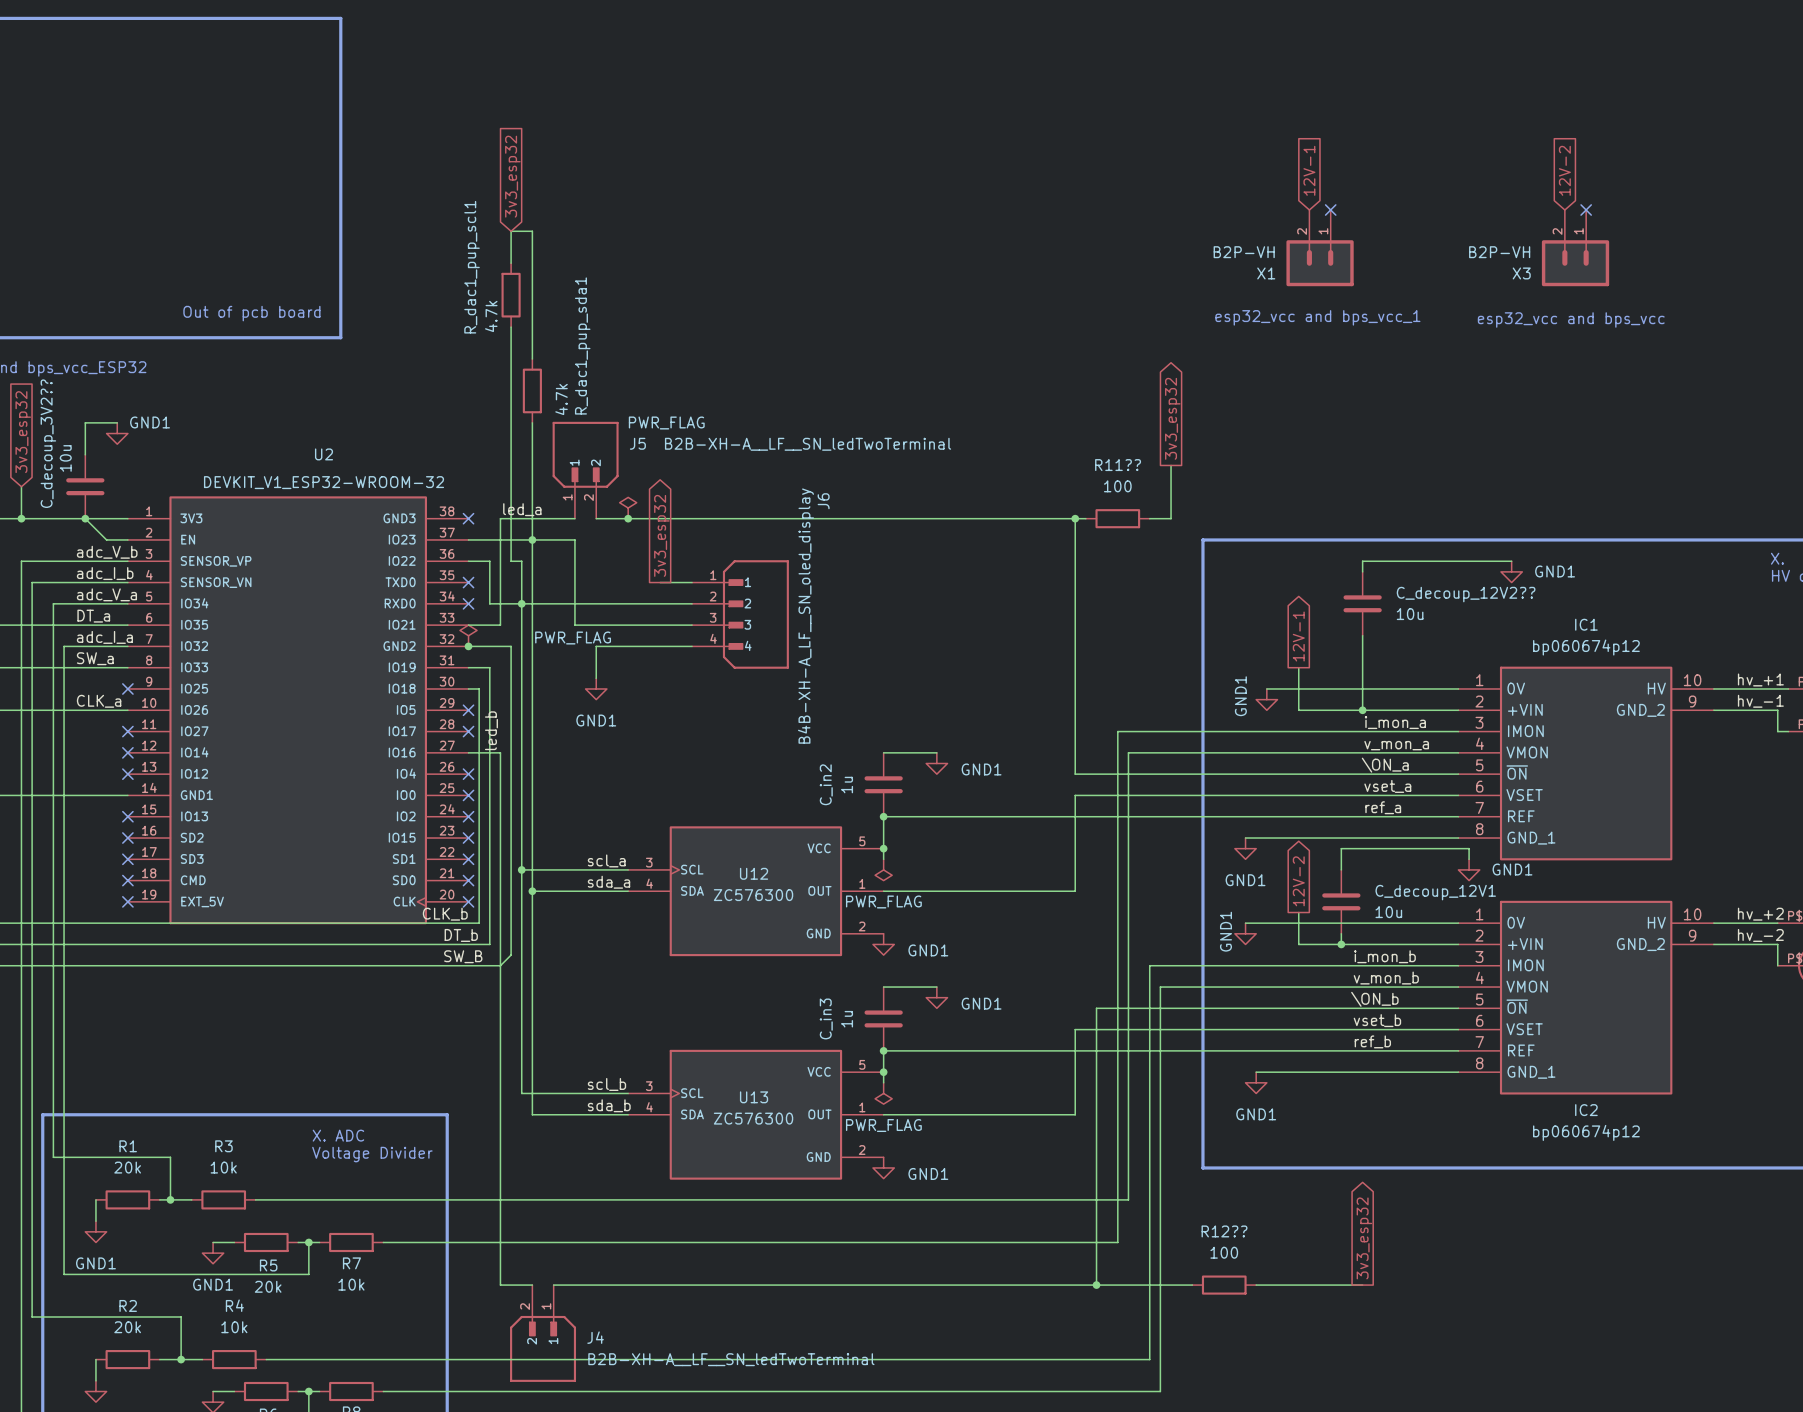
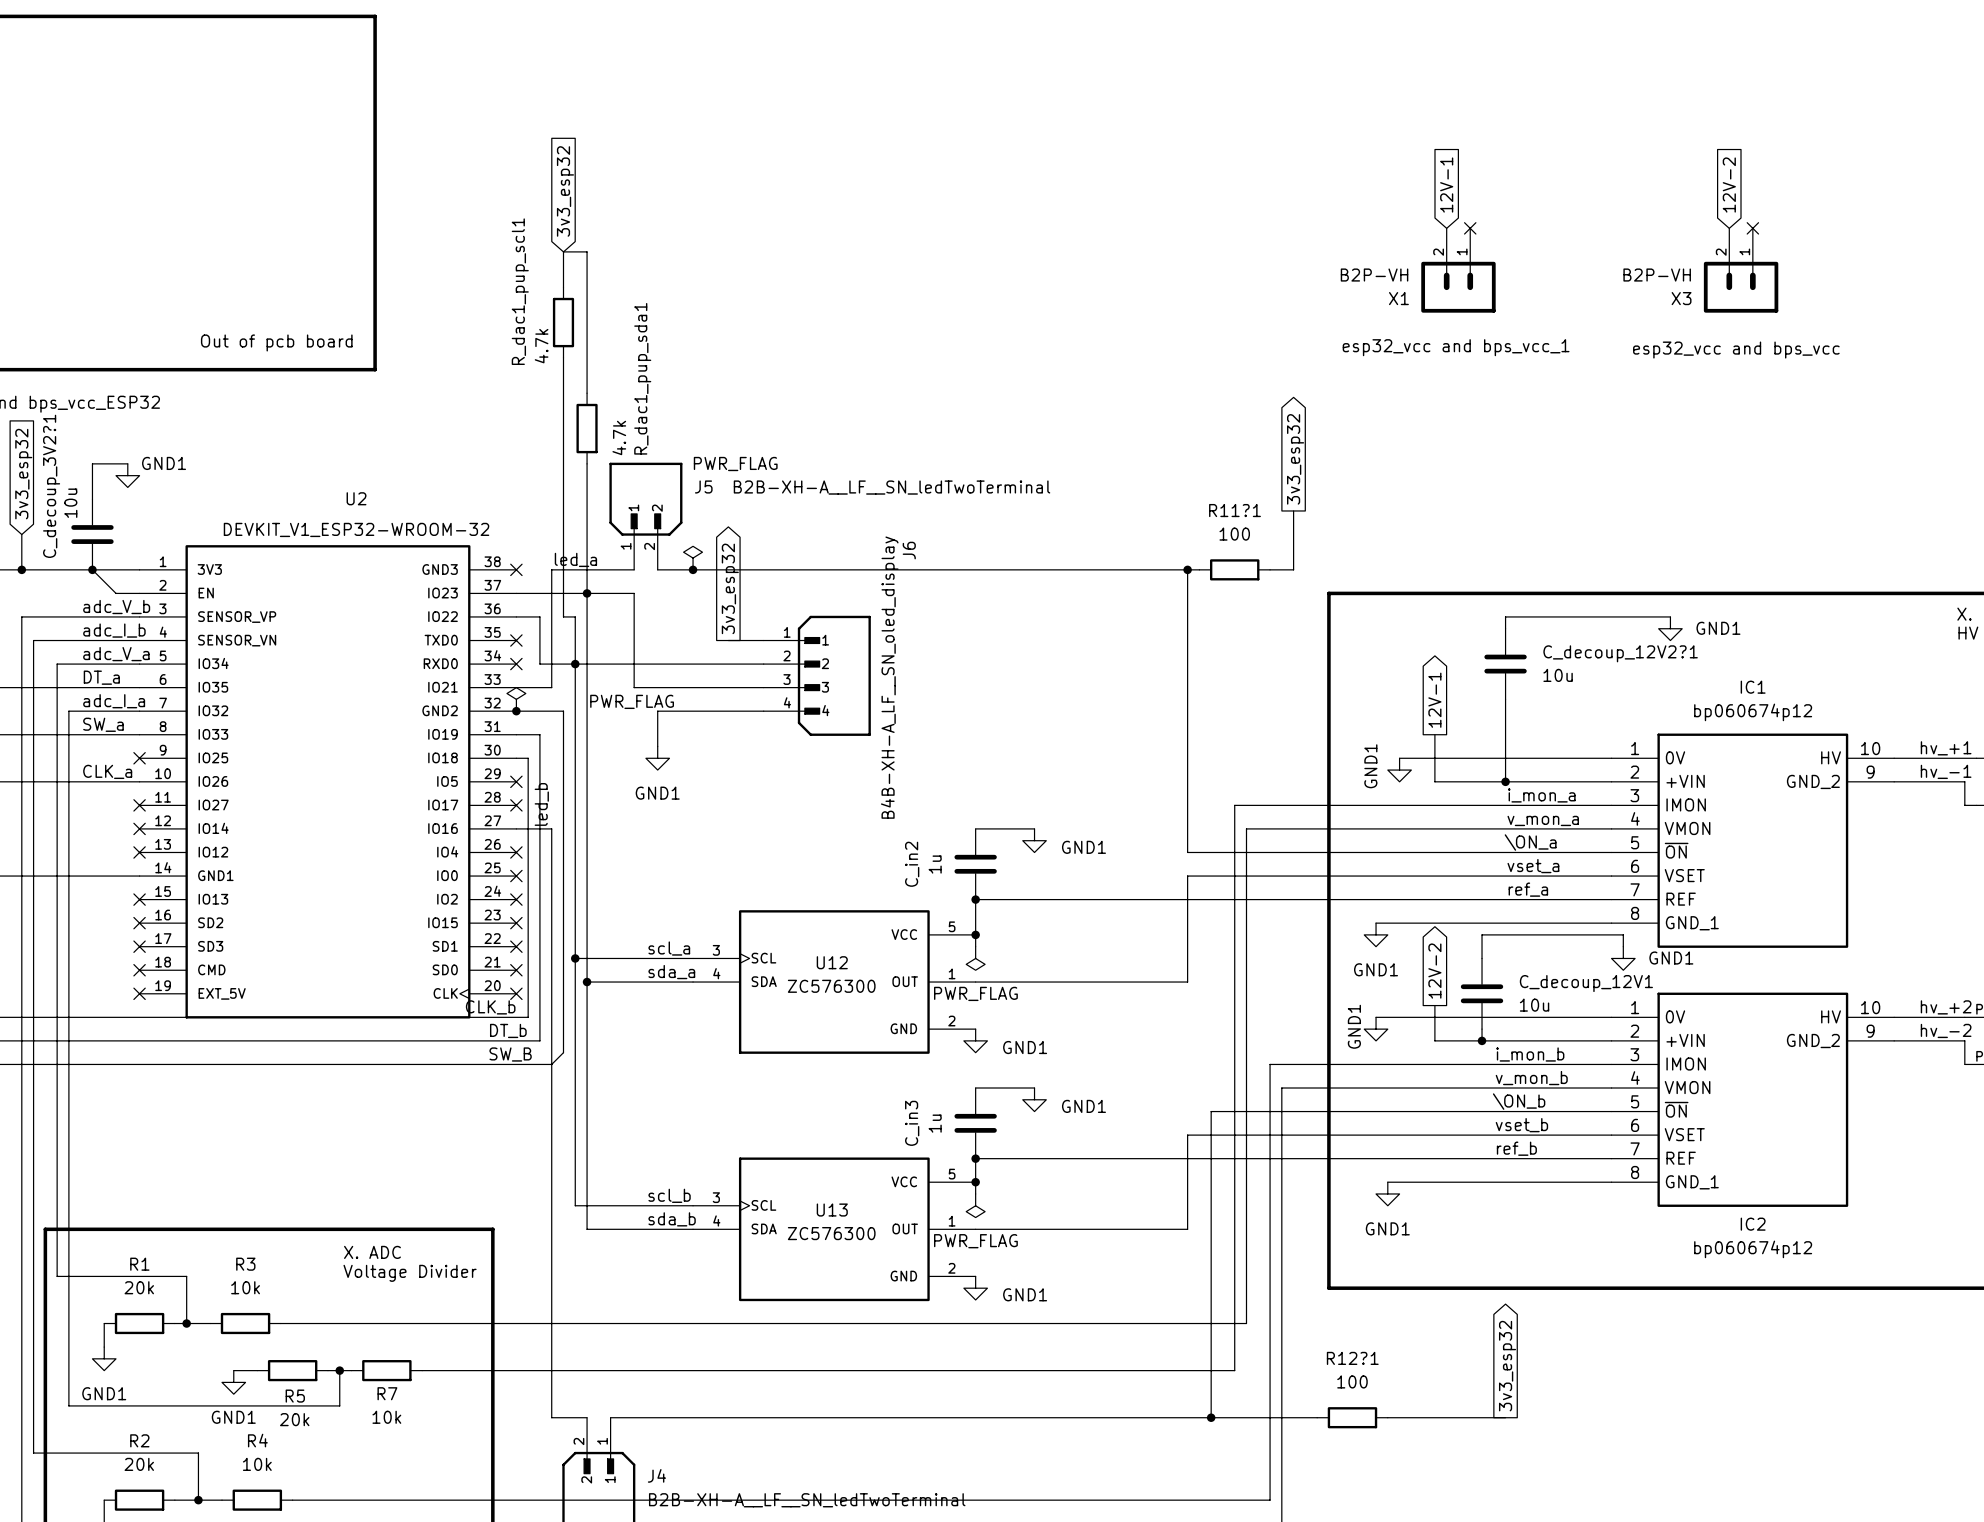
C_decoup_3V2?? name: C_decoup_3V2?? (48, 443) -> C_decoup_3V2?1 (51, 486)
R11?? name: R11?? (1118, 465) -> R11?1 (1235, 510)
C_decoup_12V2?? name: C_decoup_12V2?? (1466, 594) -> C_decoup_12V2?1 (1620, 653)
R12?? name: R12?? (1224, 1231) -> R12?1 (1352, 1358)

